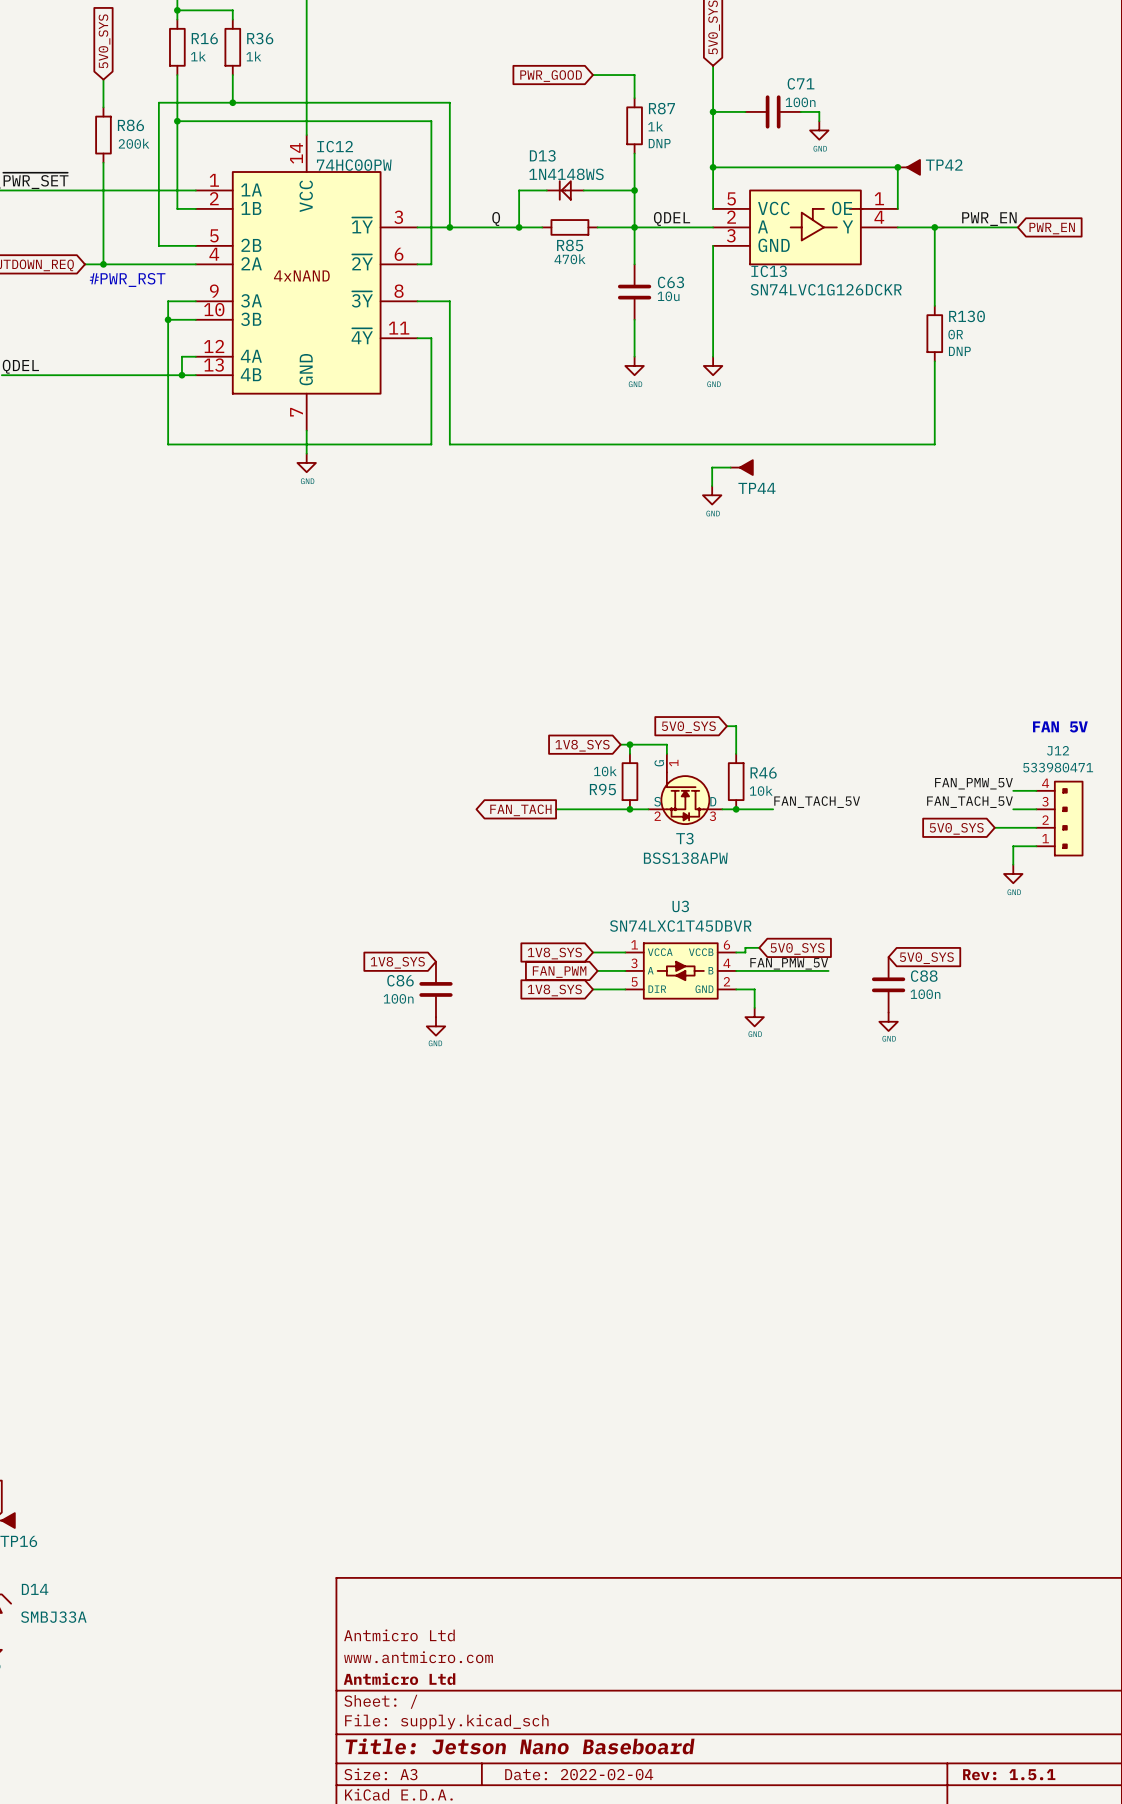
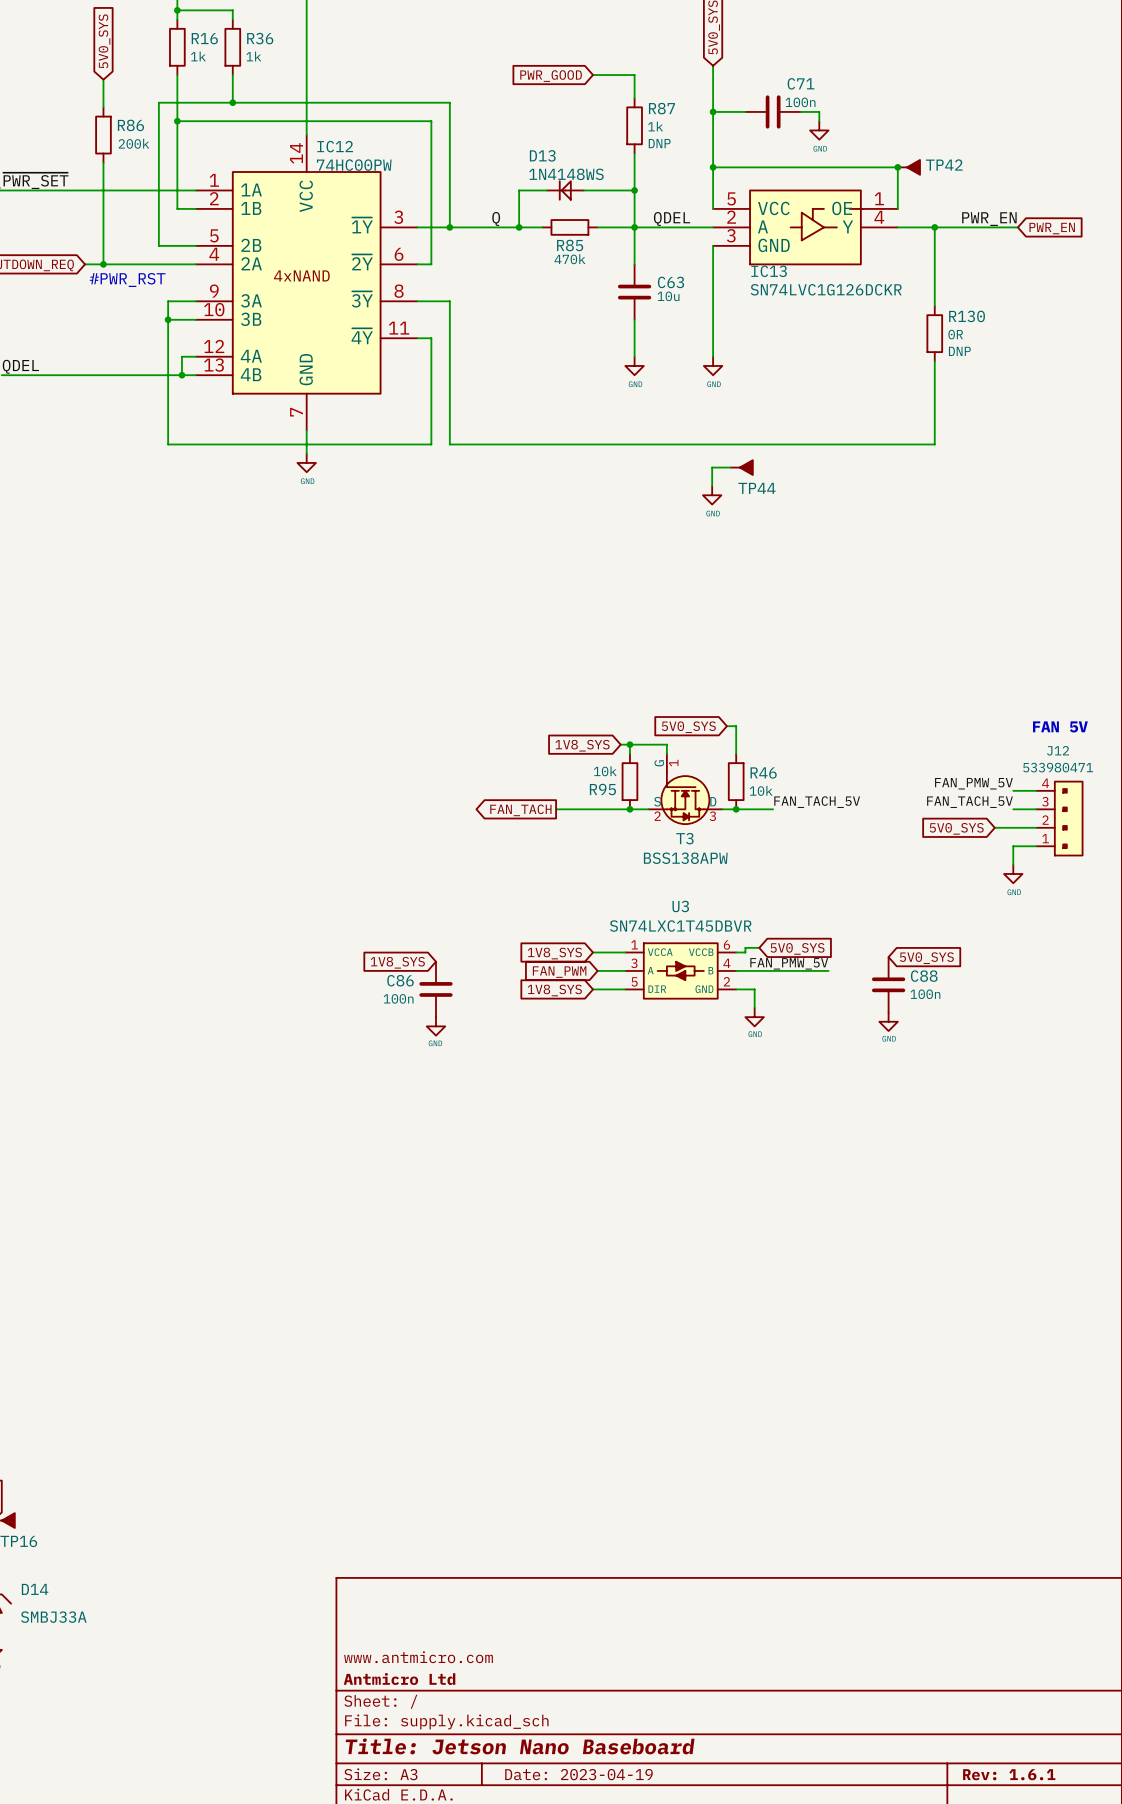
title block: Antmicro Ltd (399, 1635) -> none
title block: Date: 2022-02-04 (579, 1774) -> Date: 2023-04-19 (578, 1774)
title block: Rev: 1.5.1 (1009, 1774) -> Rev: 1.6.1 (1009, 1774)

